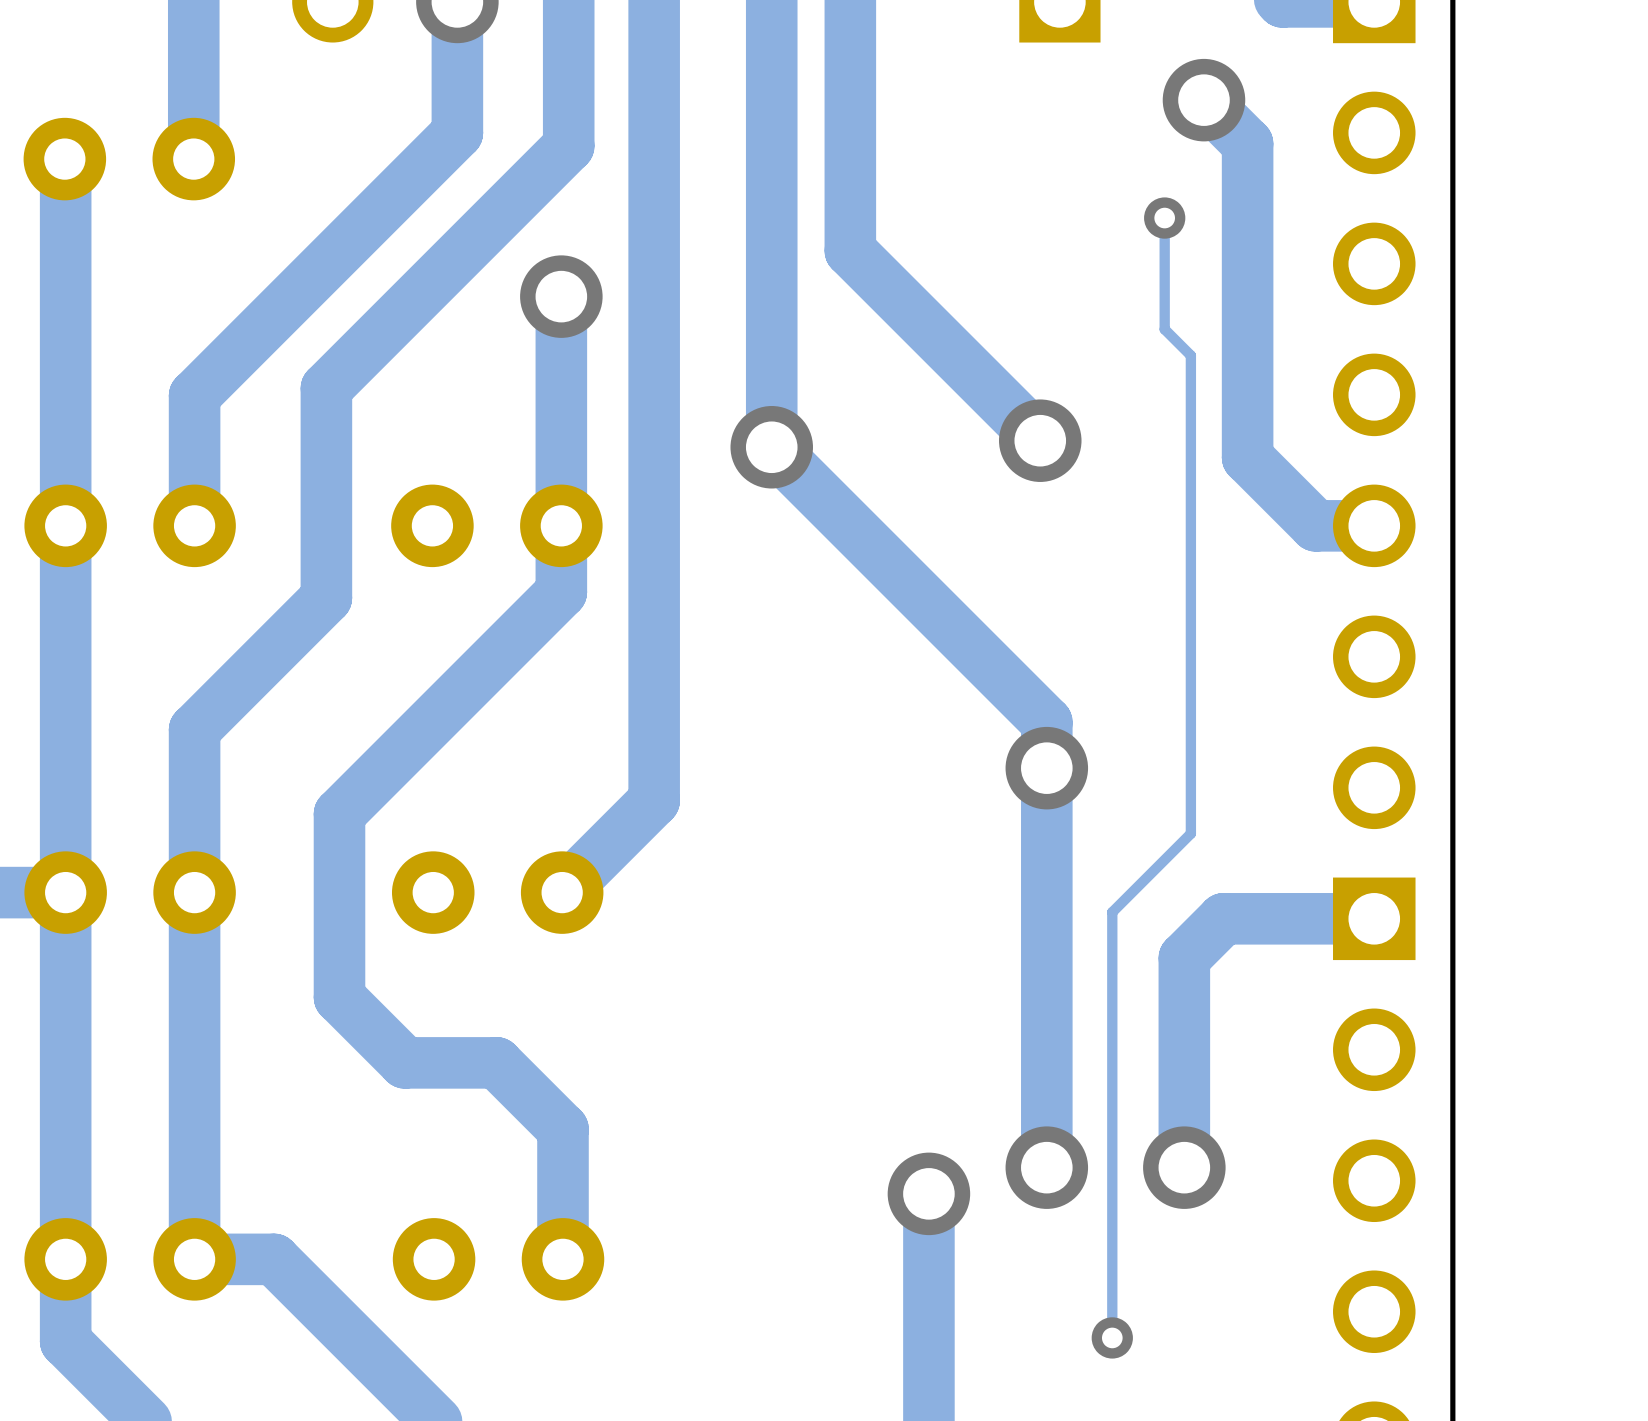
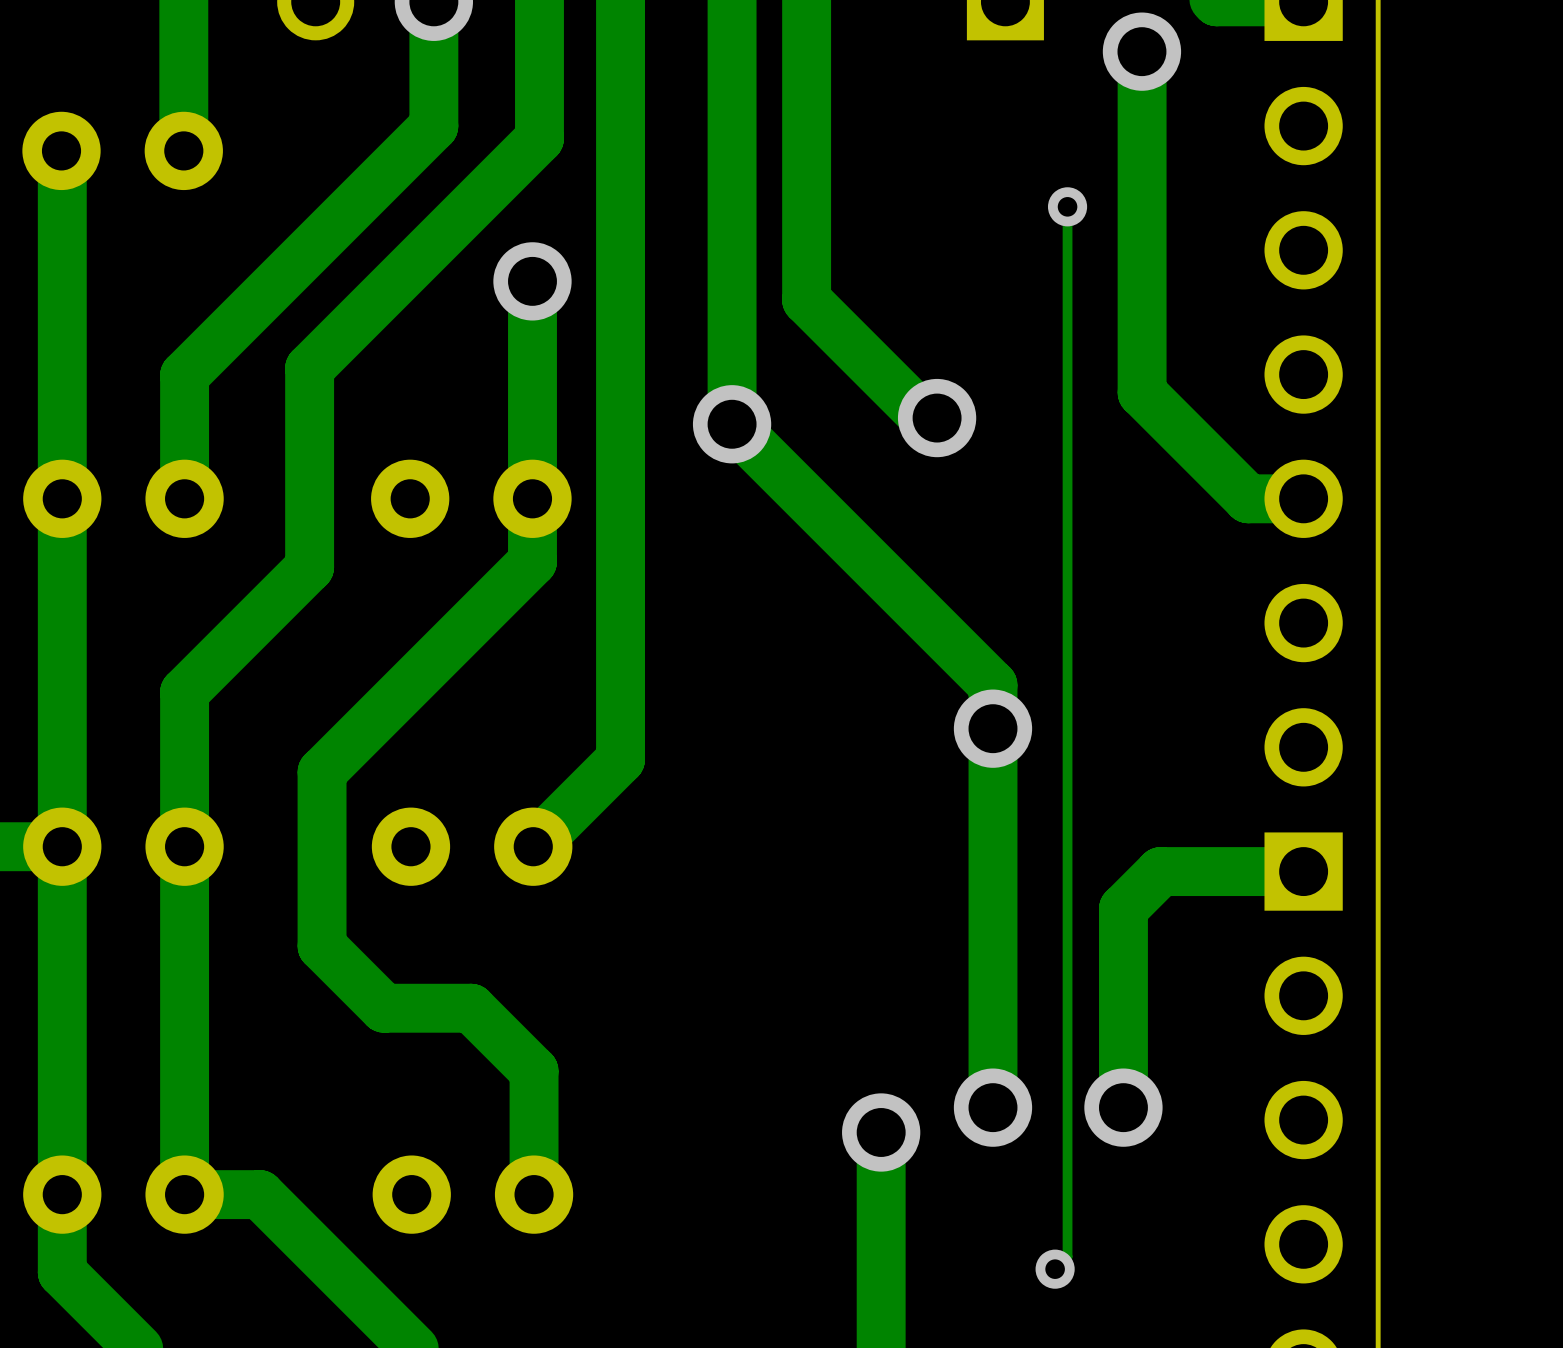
track: (1203, 100) (1247, 143) (1247, 457) -> (1142, 51) (1142, 392) (1183, 434)
via position: (1203, 100) -> (1141, 51)
track: (1164, 218) (1164, 329) (1190, 355) (1190, 833) (1112, 912) (1112, 1337) -> (1067, 206) (1067, 1256) (1055, 1269)
via position: (1164, 218) -> (1067, 206)
track: (850, 250) (1040, 440) -> (806, 237) (806, 300) (924, 418) (937, 418)
via position: (1040, 440) -> (937, 418)

